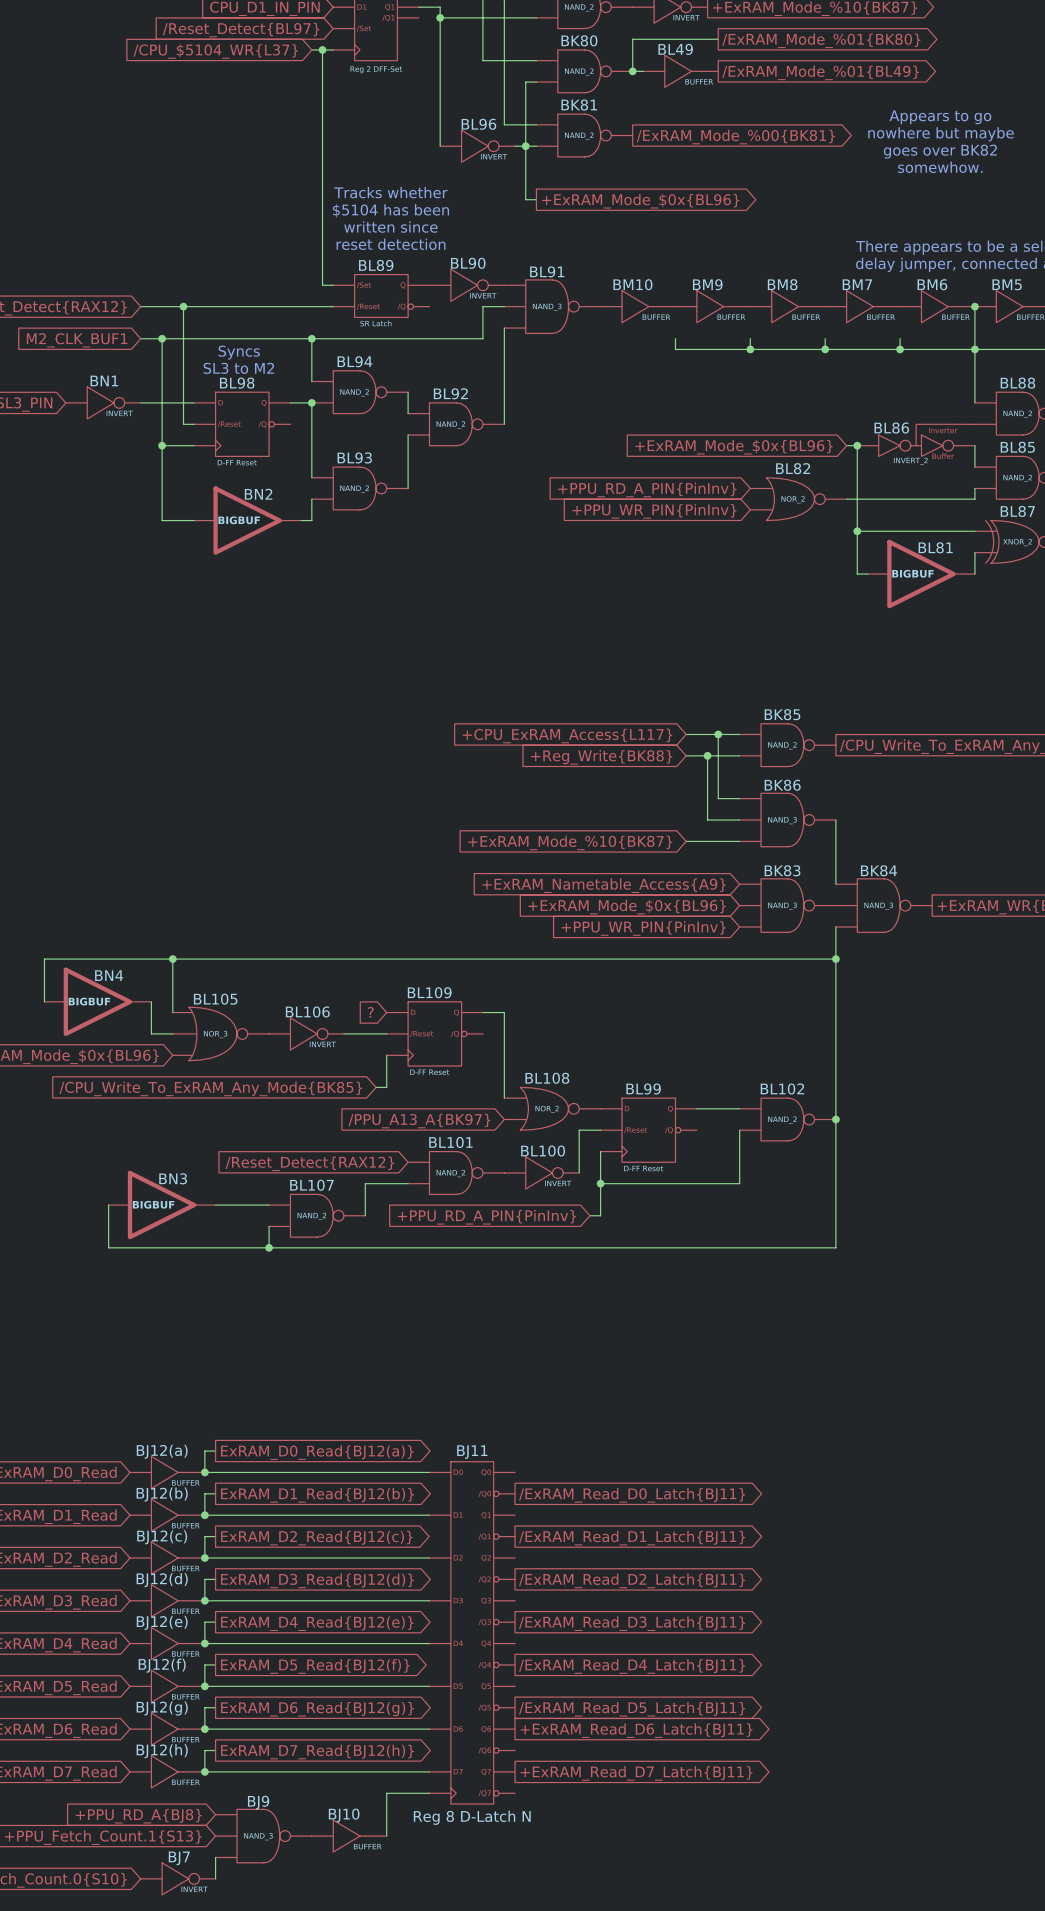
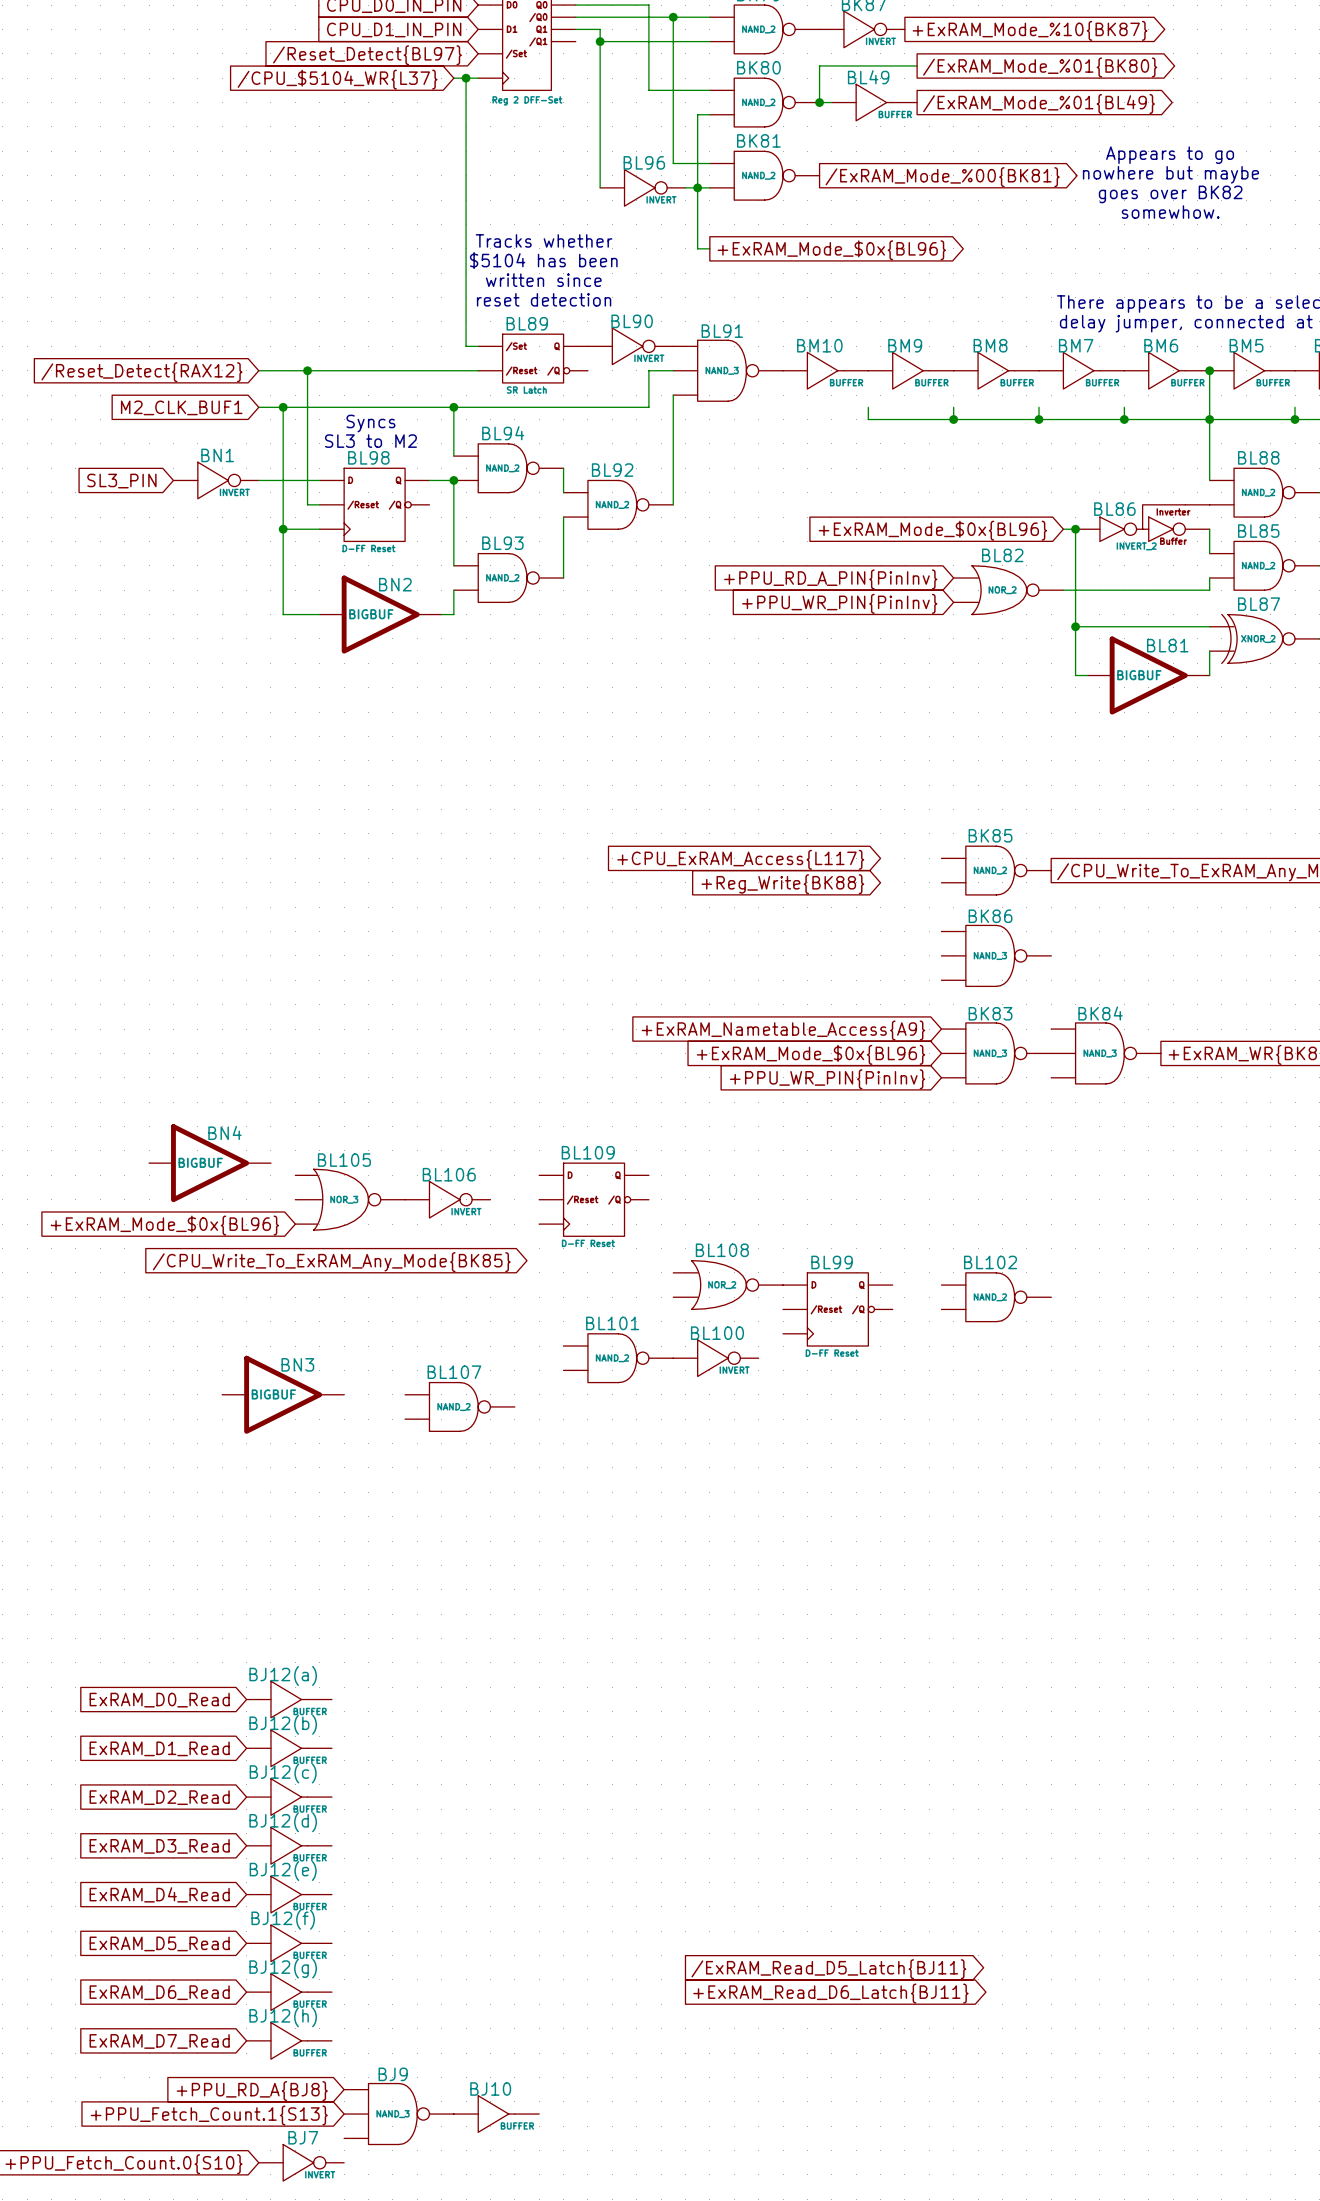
wire: (686, 734) (739, 734) -> none
wire: (718, 734) (718, 798) (739, 798) -> none
junction: (718, 734) -> none
wire: (686, 755) (739, 755) -> none
wire: (707, 755) (707, 820) (739, 820) -> none
junction: (707, 755) -> none
wire: (835, 820) (835, 884) -> none
wire: (686, 841) (739, 841) -> none
global label: +ExRAM_Mode_%10{BK87} (570, 842) -> none
wire: (835, 926) (835, 1247) (108, 1247) (108, 1205) -> none
wire: (172, 959) (172, 1012) -> none
junction: (172, 959) -> none
wire: (835, 959) (44, 959) (44, 1001) -> none
junction: (835, 959) -> none
wire: (151, 1001) (151, 1033) (172, 1033) -> none
global label: ? (370, 1012) -> none
wire: (482, 1012) (504, 1012) (504, 1098) -> none
wire: (343, 1033) (386, 1033) -> none
wire: (386, 1055) (386, 1087) (376, 1087) -> none
wire: (696, 1108) (739, 1108) -> none
junction: (835, 1119) -> none
global label: /PPU_A13_A{BK97} (419, 1121) -> none
wire: (600, 1130) (579, 1130) (579, 1172) -> none
wire: (739, 1130) (739, 1183) (600, 1183) -> none
wire: (600, 1151) (600, 1215) (589, 1215) -> none
global label: /Reset_Detect{RAX12} (309, 1163) -> none
wire: (408, 1183) (365, 1183) (365, 1215) -> none
junction: (600, 1183) -> none
wire: (215, 1205) (269, 1205) -> none
global label: +PPU_RD_A_PIN{PinInv} (486, 1217) -> none
wire: (269, 1226) (269, 1247) -> none
junction: (269, 1247) -> none
wire: (215, 1451) (204, 1451) (204, 1472) (429, 1472) -> none
global label: ExRAM_D0_Read{BJ12(a)} (317, 1452) -> none
junction: (204, 1472) -> none
wire: (215, 1493) (204, 1493) (204, 1515) (429, 1515) -> none
global label: ExRAM_D1_Read{BJ12(b)} (317, 1495) -> none
global label: /ExRAM_Read_D0_Latch{BJ11} (632, 1495) -> none
junction: (204, 1515) -> none
wire: (215, 1536) (204, 1536) (204, 1558) (429, 1558) -> none
global label: ExRAM_D2_Read{BJ12(c)} (316, 1538) -> none
global label: /ExRAM_Read_D1_Latch{BJ11} (632, 1538) -> none
junction: (204, 1558) -> none
wire: (215, 1579) (204, 1579) (204, 1600) (429, 1600) -> none
global label: ExRAM_D3_Read{BJ12(d)} (317, 1580) -> none
global label: /ExRAM_Read_D2_Latch{BJ11} (632, 1580) -> none
junction: (204, 1600) -> none
wire: (215, 1622) (204, 1622) (204, 1643) (429, 1643) -> none
global label: ExRAM_D4_Read{BJ12(e)} (317, 1623) -> none
global label: /ExRAM_Read_D3_Latch{BJ11} (632, 1623) -> none
BJ11: Reg 8 D-Latch N (472, 1632) -> none
junction: (204, 1643) -> none
wire: (215, 1664) (204, 1664) (204, 1686) (429, 1686) -> none
global label: ExRAM_D5_Read{BJ12(f)} (315, 1666) -> none
global label: /ExRAM_Read_D4_Latch{BJ11} (632, 1666) -> none
junction: (204, 1686) -> none
wire: (215, 1707) (204, 1707) (204, 1729) (429, 1729) -> none
global label: ExRAM_D6_Read{BJ12(g)} (317, 1709) -> none
junction: (204, 1729) -> none
wire: (215, 1750) (204, 1750) (204, 1771) (429, 1771) -> none
global label: ExRAM_D7_Read{BJ12(h)} (317, 1752) -> none
junction: (204, 1771) -> none
global label: +ExRAM_Read_D7_Latch{BJ11} (636, 1773) -> none
wire: (429, 1793) (386, 1793) (386, 1836) -> none
wire: (215, 1857) (215, 1878) -> none

